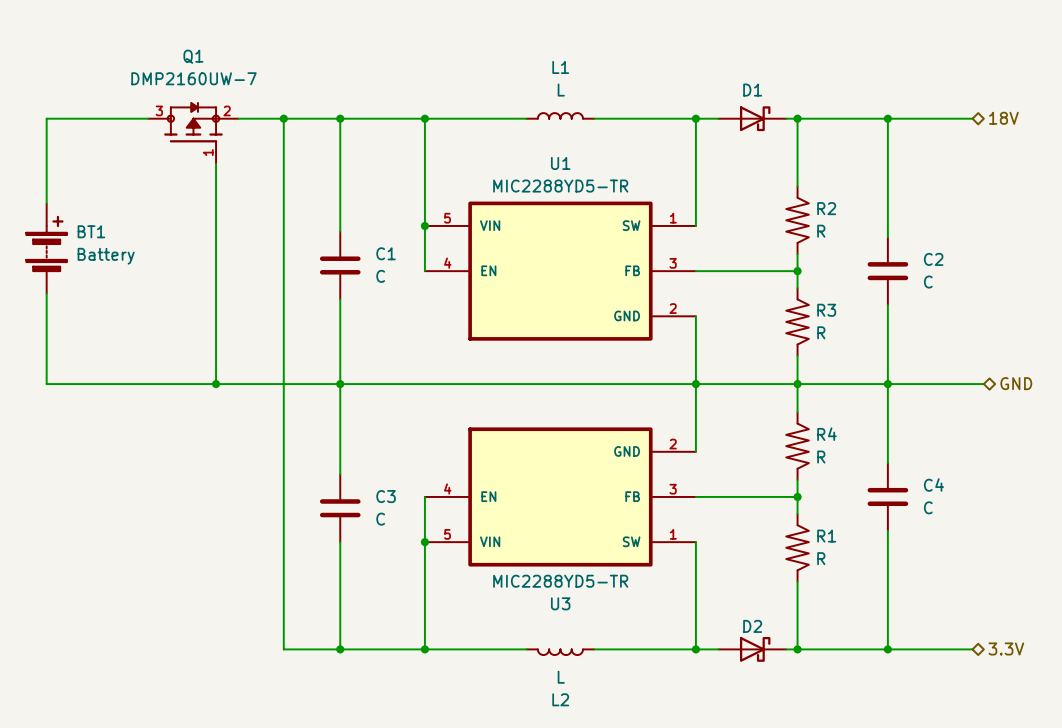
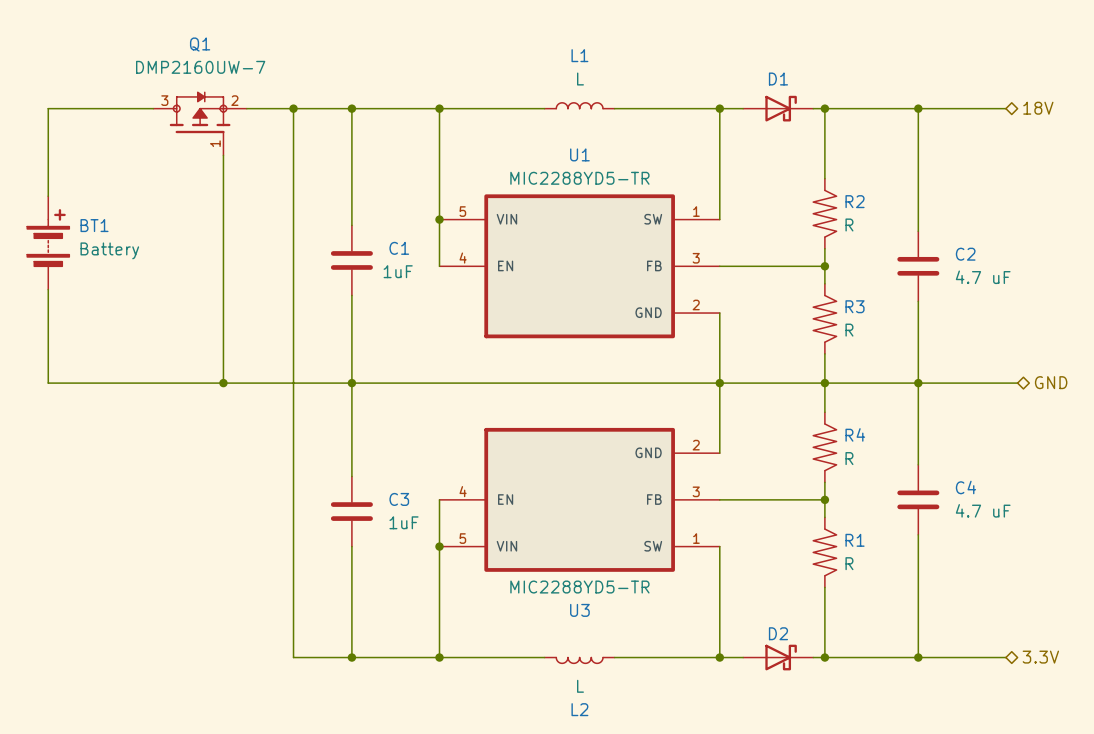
C1 value: C (380, 276) -> 1uF (398, 271)
C2 value: C (928, 282) -> 4.7 uF (983, 277)
C4 value: C (928, 507) -> 4.7 uF (983, 510)
C3 value: C (380, 519) -> 1uF (404, 522)

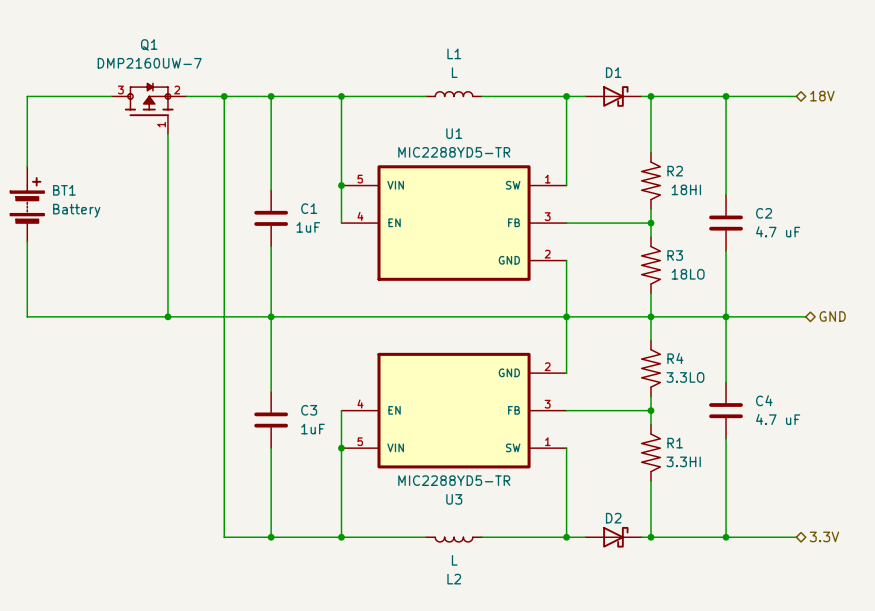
R2 value: R (849, 224) -> 18HI (686, 189)
R3 value: R (849, 330) -> 18LO (688, 274)
R4 value: R (849, 458) -> 3.3LO (685, 377)
R1 value: R (849, 563) -> 3.3HI (683, 461)

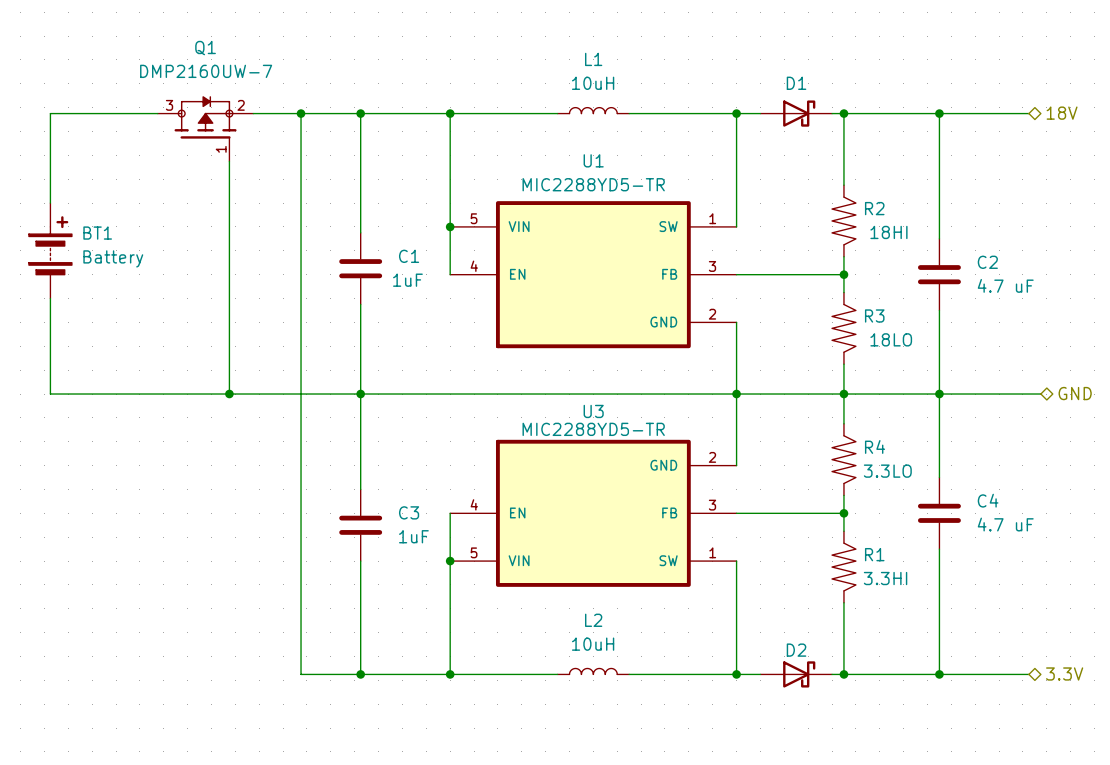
L1 value: L (454, 72) -> 10uH (593, 83)
U3 value position: MIC2288YD5-TR (454, 480) -> MIC2288YD5-TR (593, 429)
U3 name position: U3 (454, 499) -> U3 (593, 411)
L2 rotation: 0° (454, 539) -> 180° (593, 671)
L2 value: L (454, 560) -> 10uH (593, 644)

